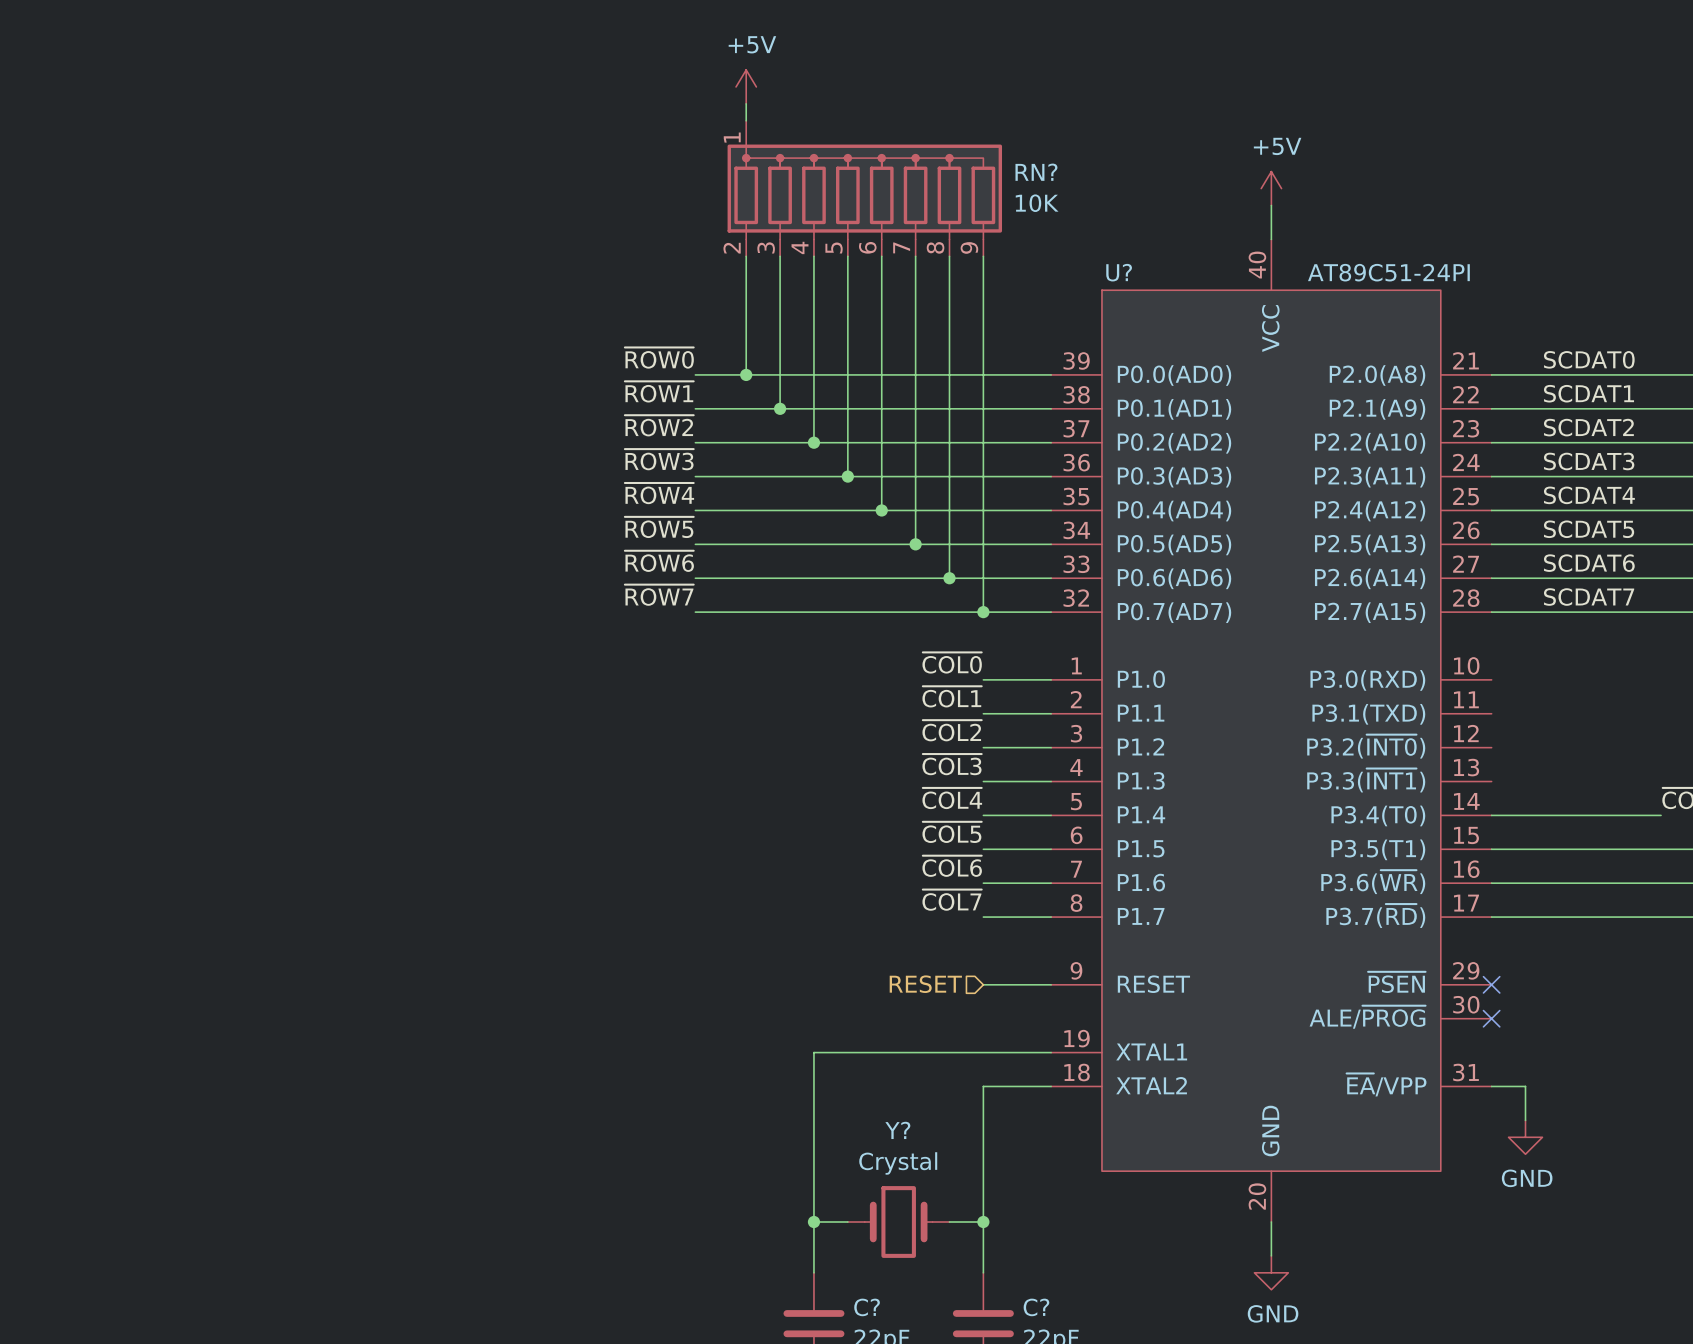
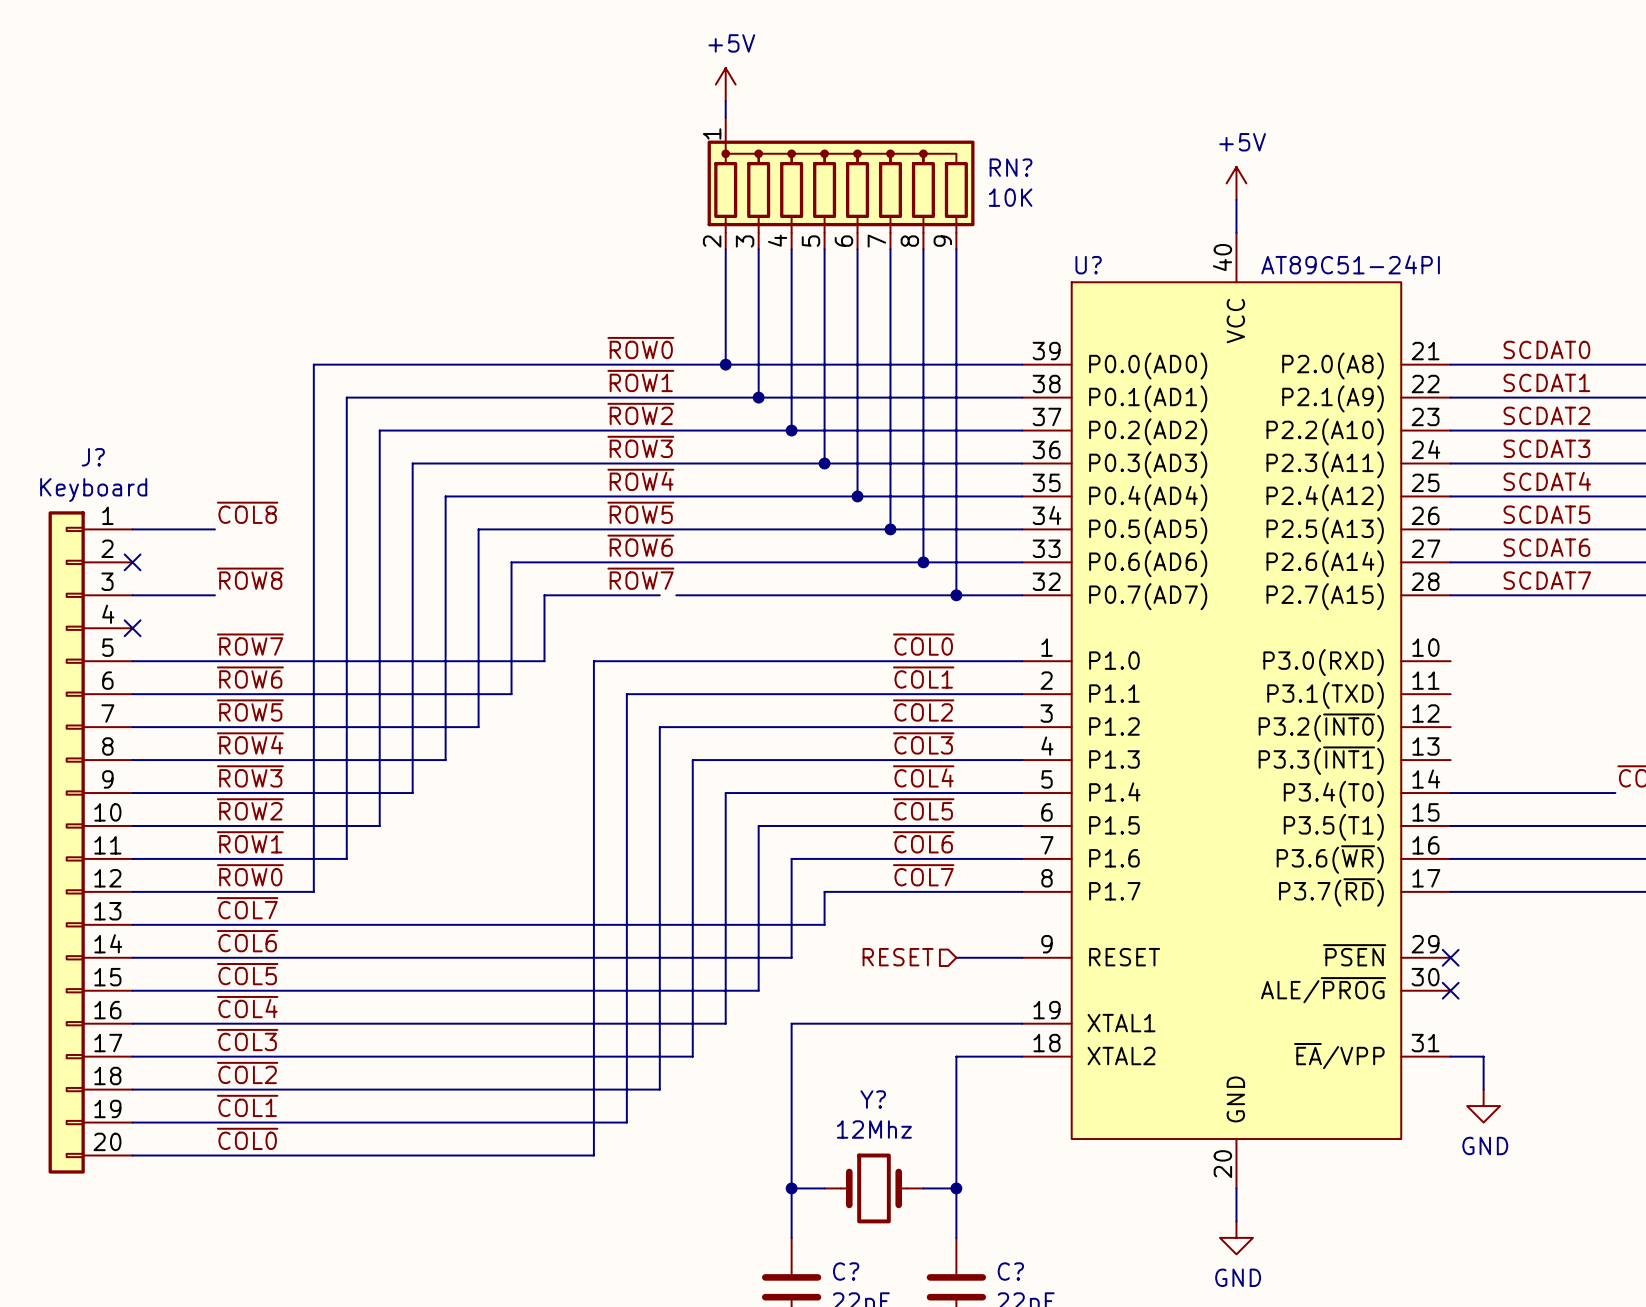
wire: none -> (676, 364) (313, 364) (313, 891) (132, 891)
wire: none -> (676, 397) (346, 397) (346, 858) (132, 858)
wire: none -> (676, 430) (379, 430) (379, 825) (132, 825)
wire: none -> (676, 463) (412, 463) (412, 793) (132, 793)
wire: none -> (676, 496) (445, 496) (445, 760) (132, 760)
label: none -> ~{COL8} (247, 512)
wire: none -> (132, 529) (214, 529)
wire: none -> (676, 529) (478, 529) (478, 727) (132, 727)
no-connect mark: none -> (132, 562)
wire: none -> (676, 562) (511, 562) (511, 694) (132, 694)
label: none -> ~{ROW8} (250, 578)
wire: none -> (132, 595) (214, 595)
wire: none -> (659, 595) (544, 595) (544, 661) (132, 661)
no-connect mark: none -> (132, 628)
label: none -> ~{ROW7} (250, 644)
wire: none -> (956, 661) (593, 661) (593, 1155) (132, 1155)
label: none -> ~{ROW6} (250, 677)
wire: none -> (956, 694) (626, 694) (626, 1122) (132, 1122)
label: none -> ~{ROW5} (250, 710)
wire: none -> (956, 727) (659, 727) (659, 1089) (132, 1089)
label: none -> ~{ROW4} (250, 743)
wire: none -> (956, 760) (692, 760) (692, 1056) (132, 1056)
label: none -> ~{ROW3} (250, 776)
wire: none -> (956, 793) (725, 793) (725, 1023) (132, 1023)
label: none -> ~{ROW2} (250, 809)
wire: none -> (956, 825) (758, 825) (758, 990) (132, 990)
J?: none -> Keyboard (90, 842)
label: none -> ~{ROW1} (250, 842)
wire: none -> (956, 858) (791, 858) (791, 957) (132, 957)
label: none -> ~{ROW0} (250, 875)
wire: none -> (956, 891) (824, 891) (824, 924) (132, 924)
label: none -> ~{COL7} (247, 908)
label: none -> ~{COL6} (247, 941)
label: none -> ~{COL5} (247, 974)
label: none -> ~{COL4} (247, 1007)
label: none -> ~{COL3} (247, 1040)
label: none -> ~{COL2} (247, 1072)
label: none -> ~{COL1} (247, 1105)
Y? value: Crystal (898, 1163) -> 12Mhz (874, 1129)
label: none -> ~{COL0} (247, 1138)

